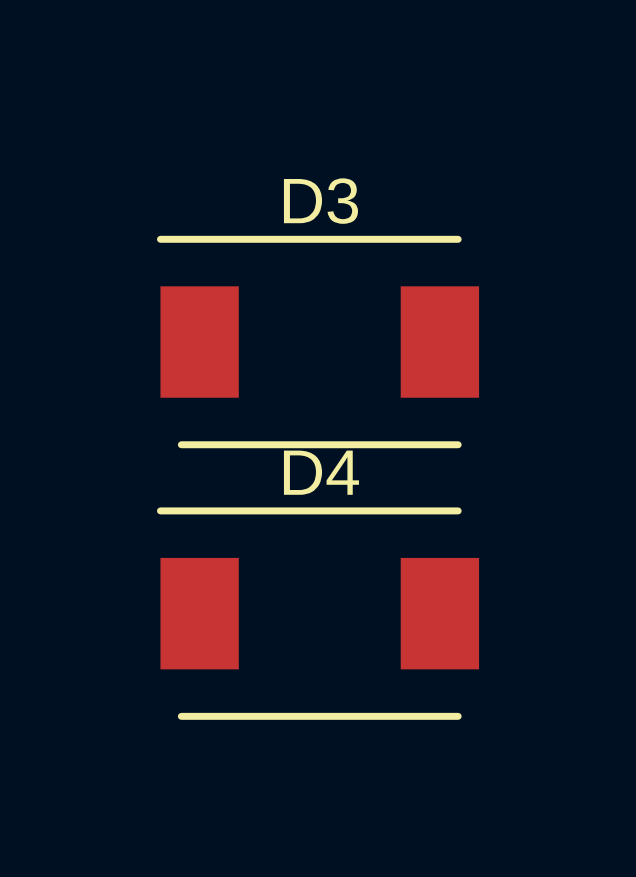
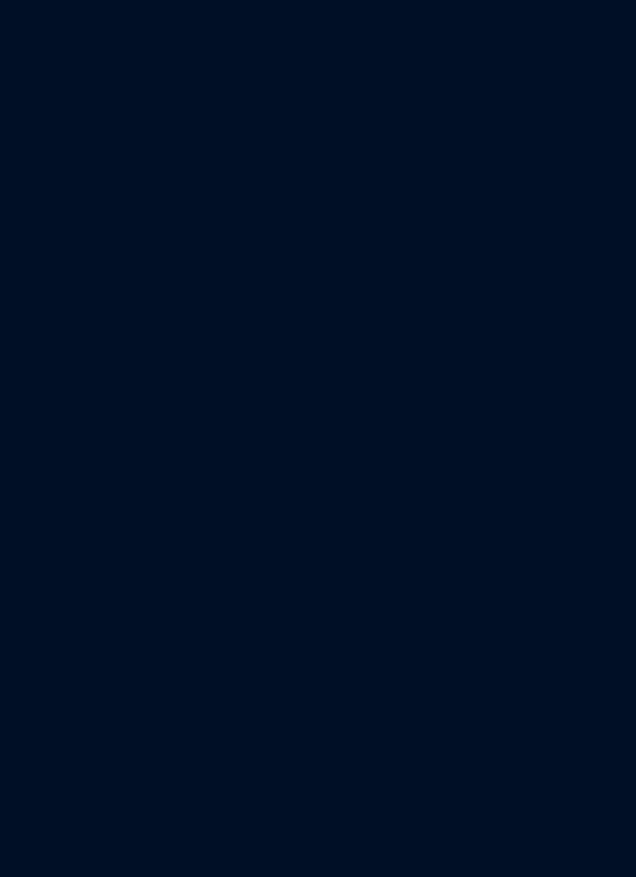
D3: (318, 342) -> none
D4: (318, 613) -> none

